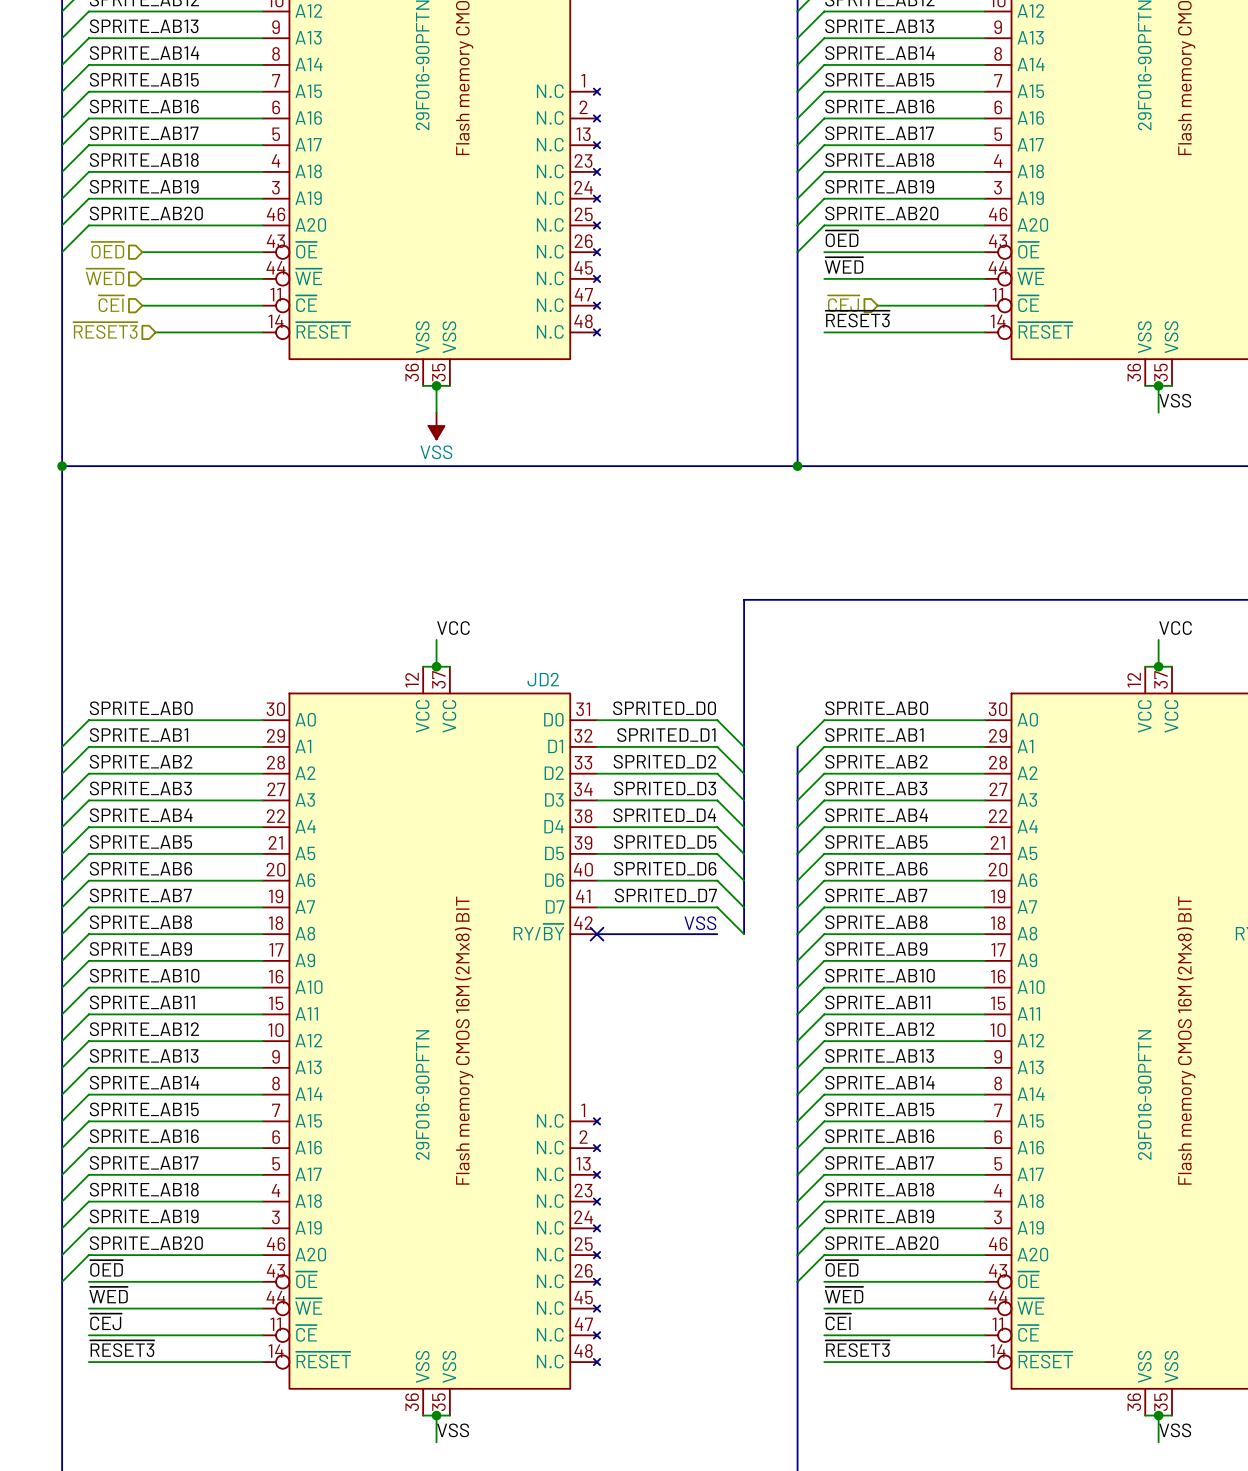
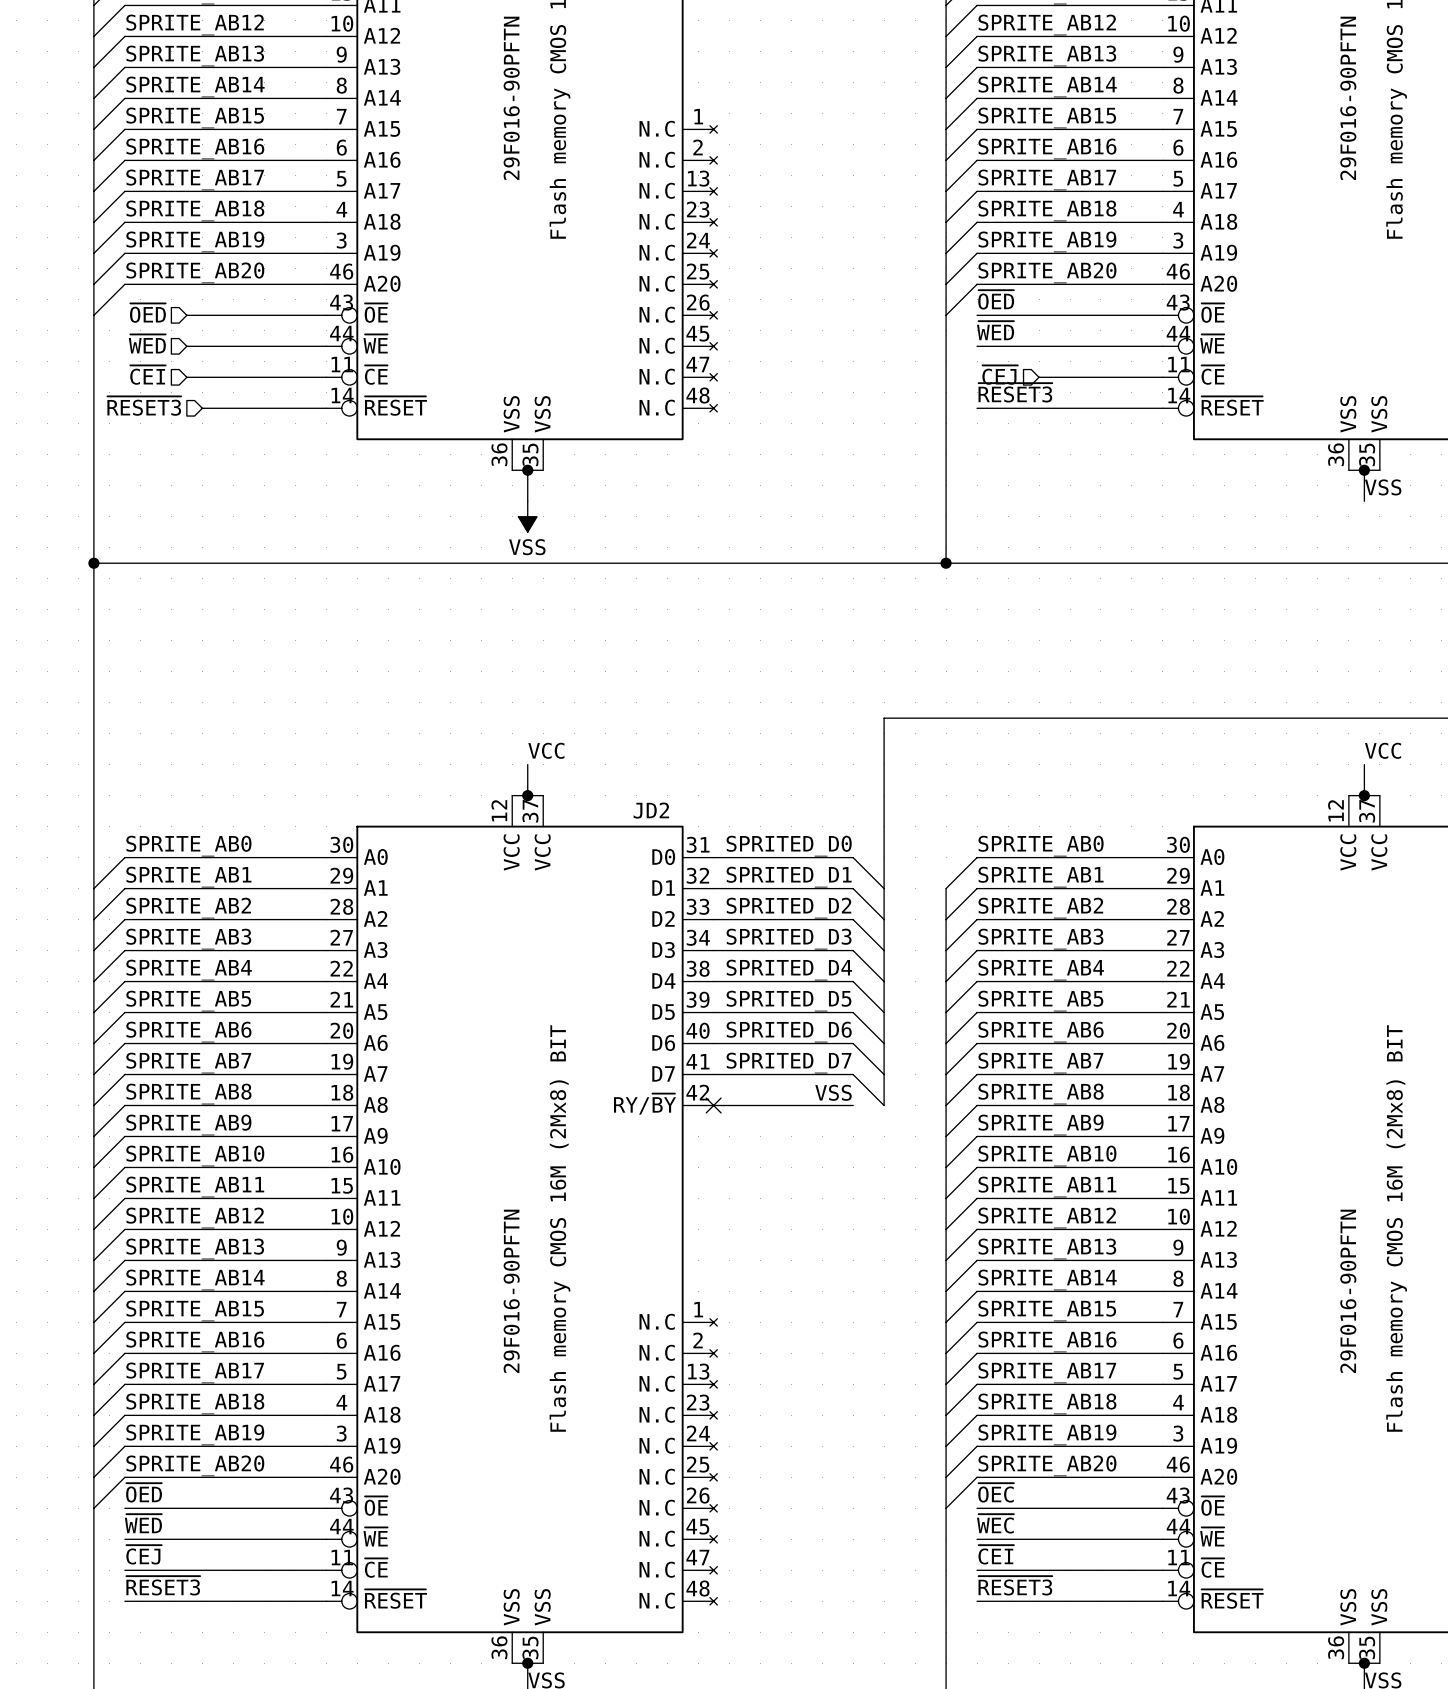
label: ~{OED} (842, 1268) -> ~{OEC} (996, 1492)
label: ~{WED} (844, 1295) -> ~{WEC} (995, 1523)

